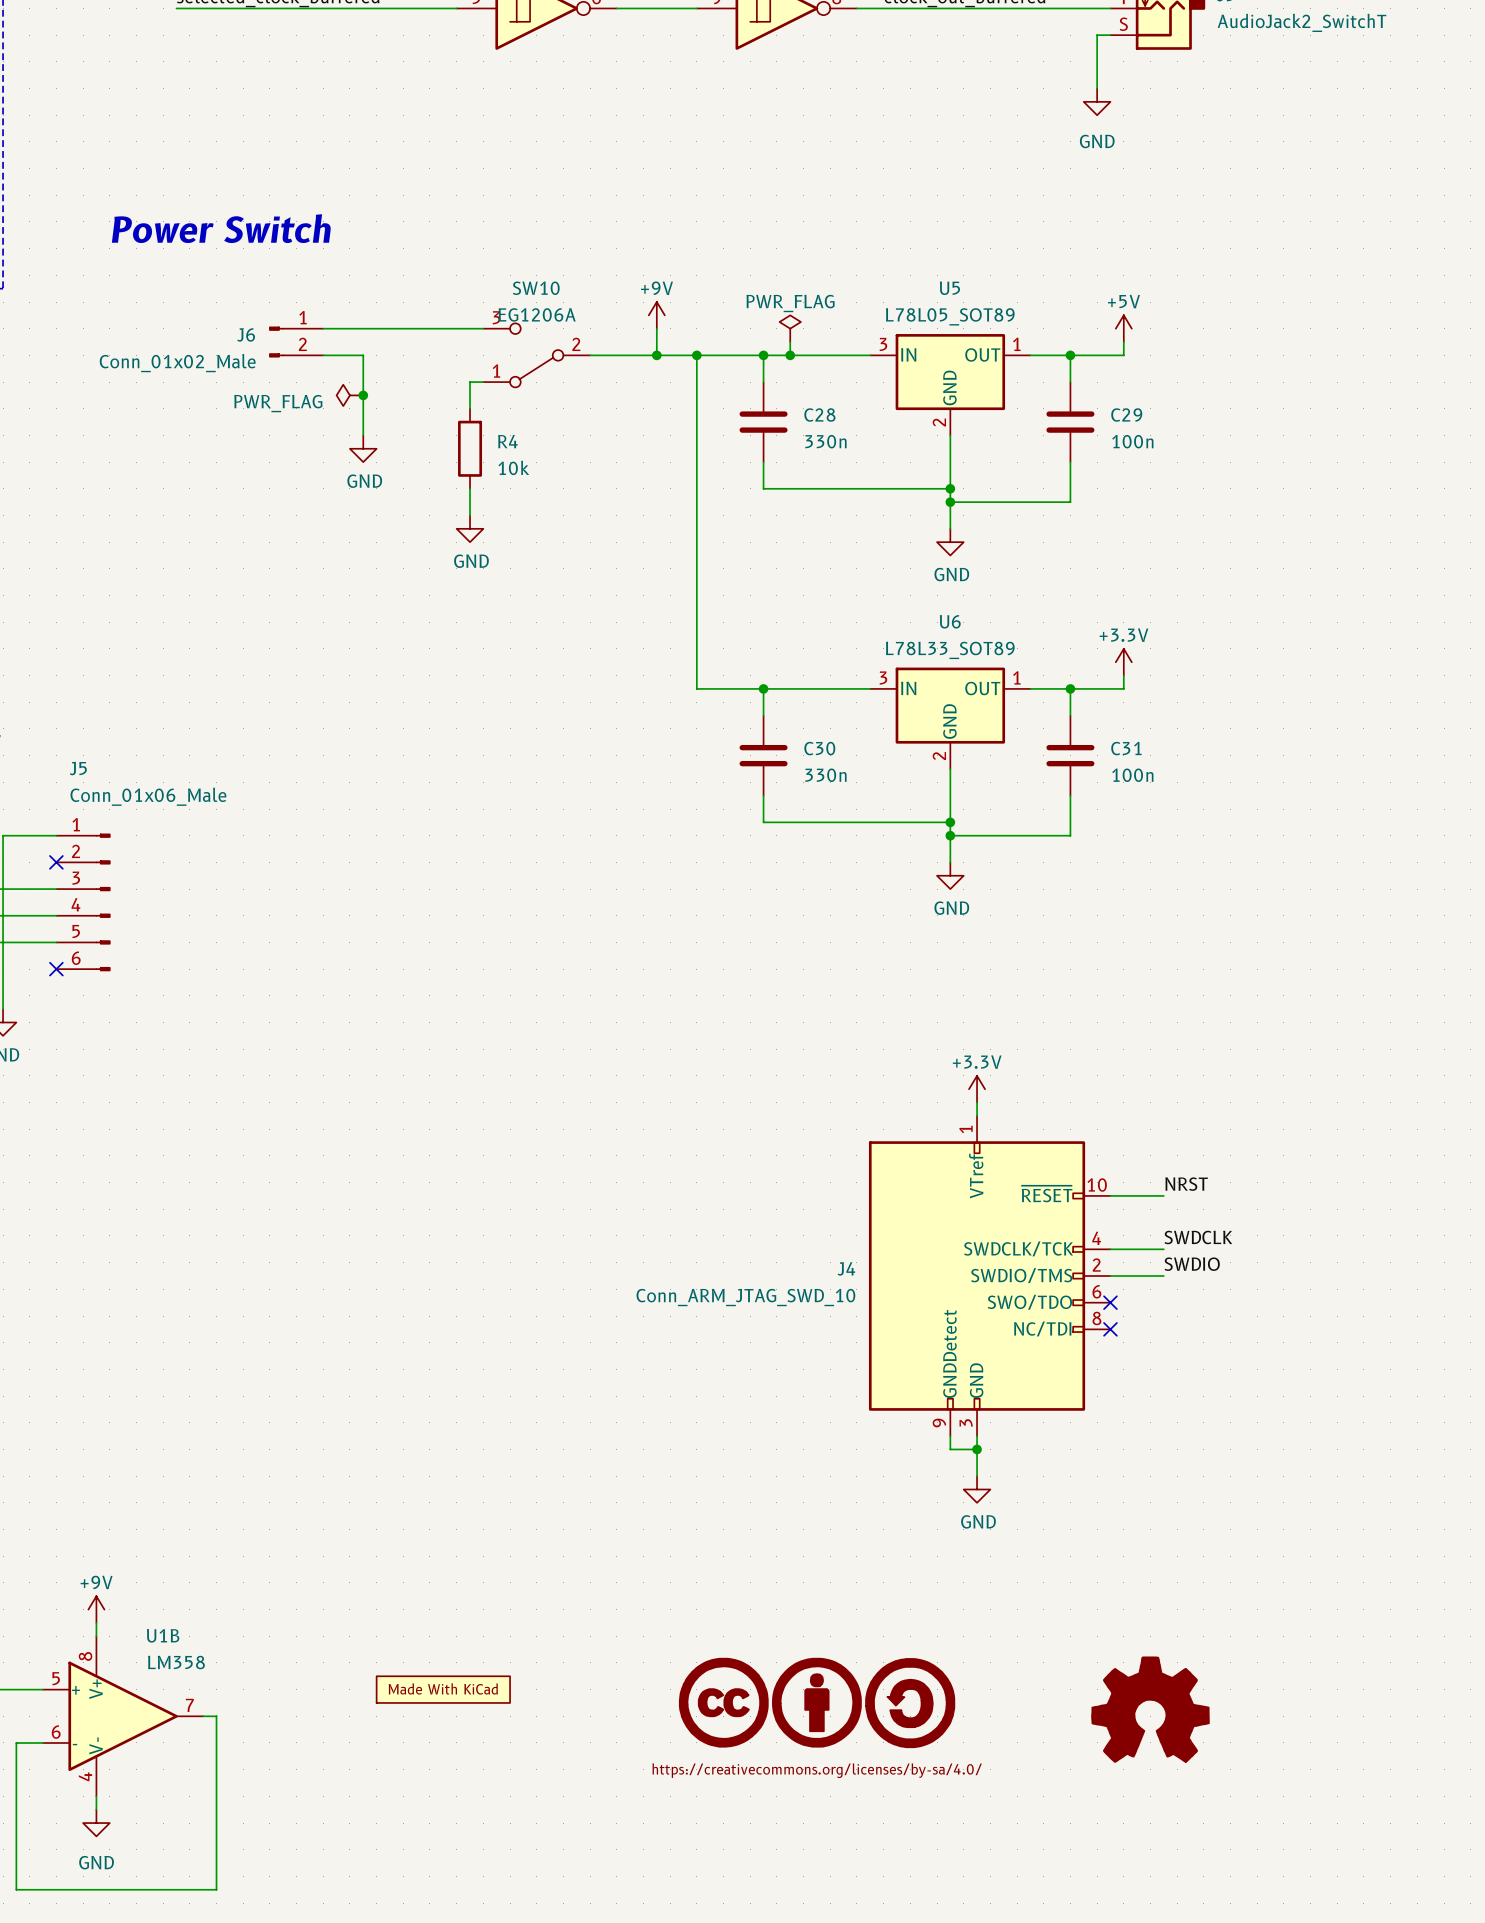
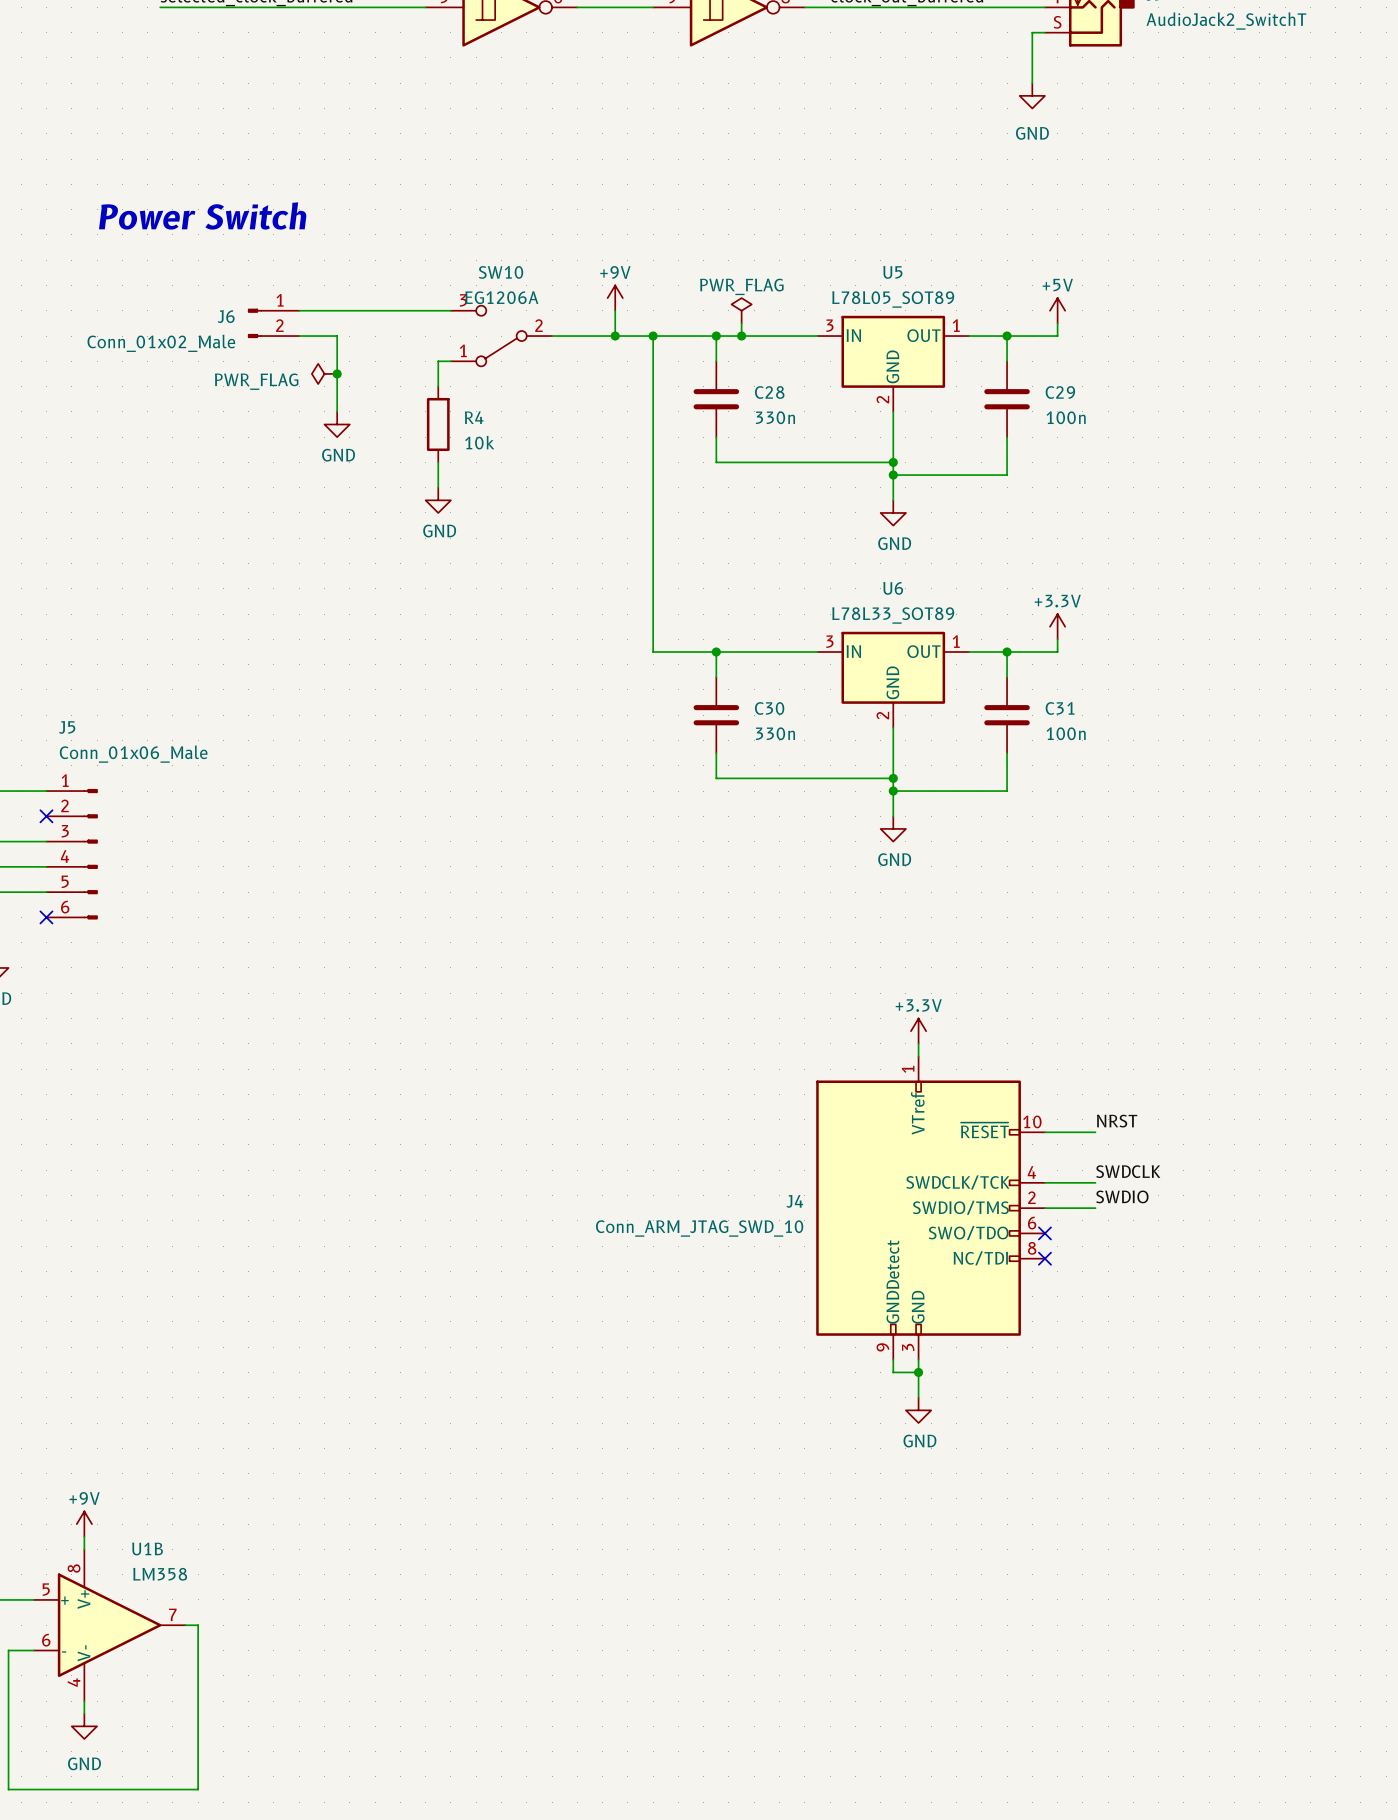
part: (443, 1689) -> none
part: (817, 1702) -> none
part: (1150, 1709) -> none

